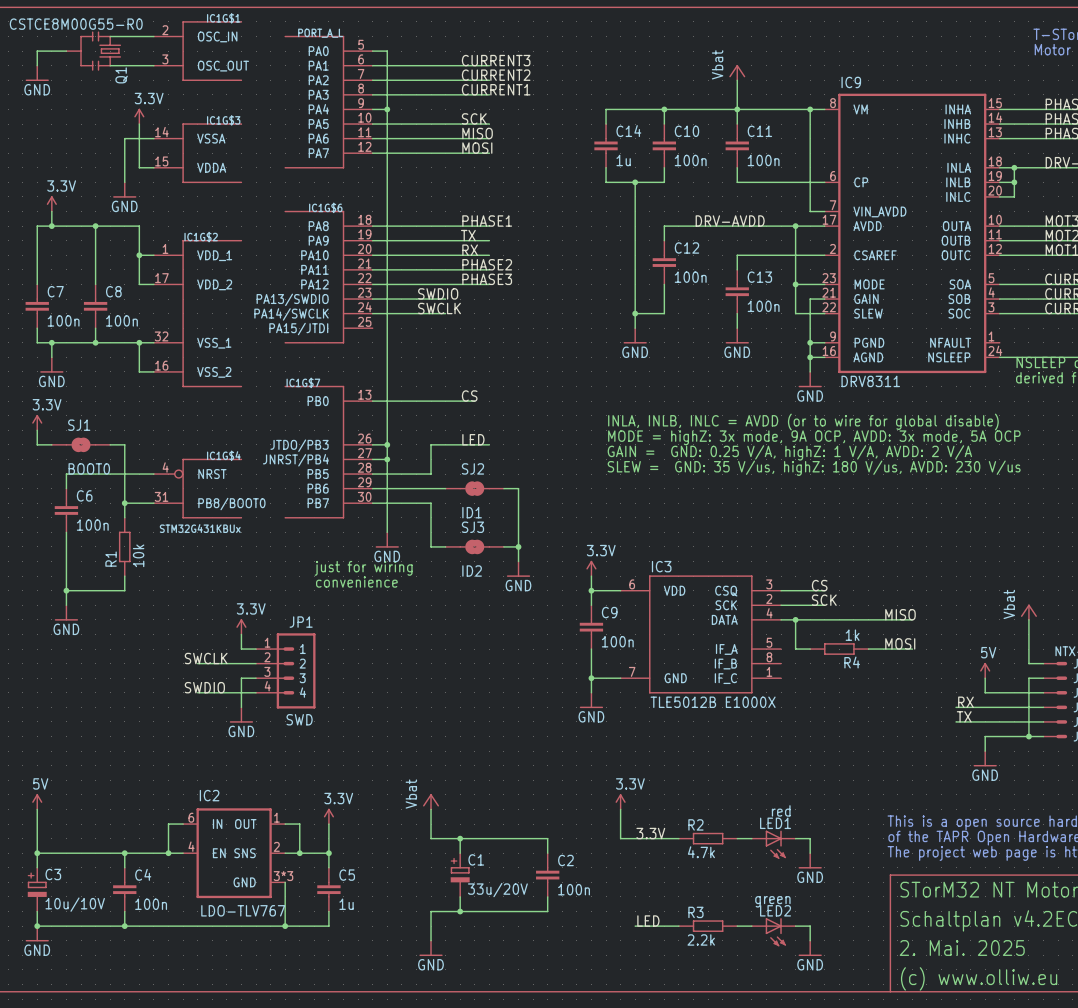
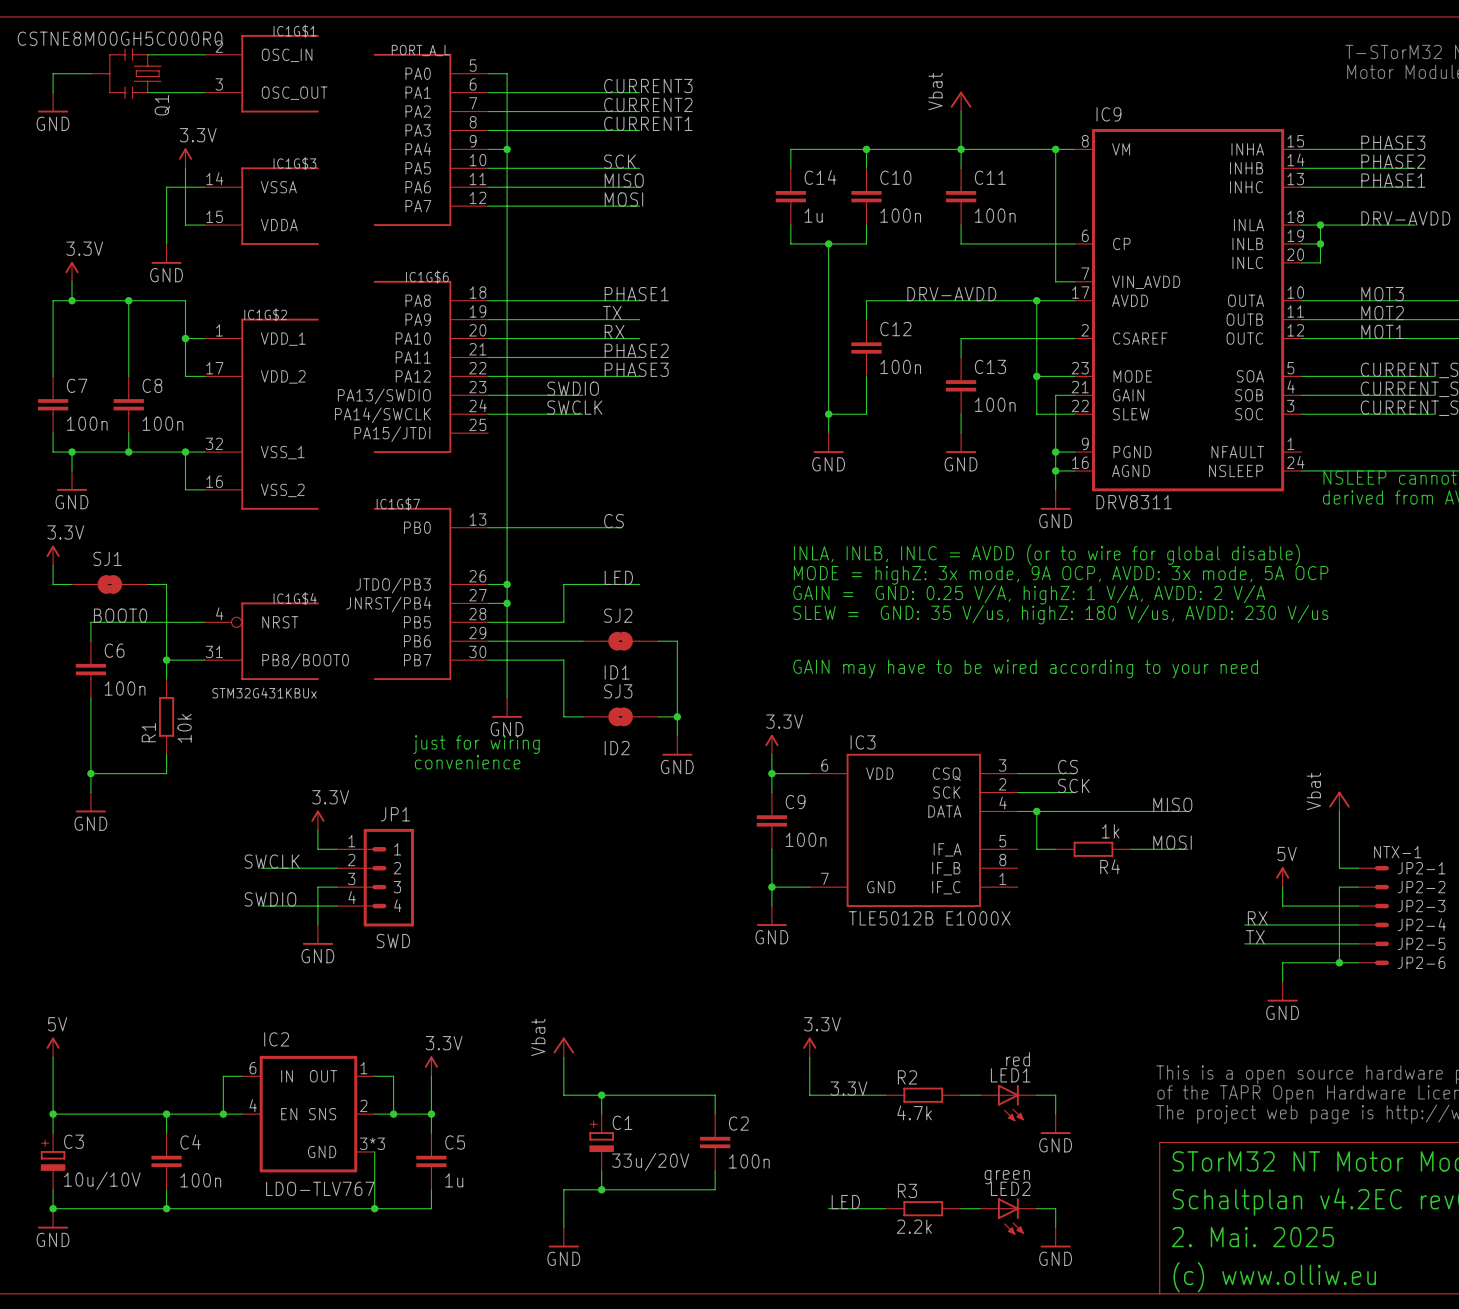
Q1 value: CSTCE8M00G55-R0 (76, 24) -> CSTNE8M00GH5C000R0 (120, 38)
text: none -> GAIN may have to be wired according to your need (1025, 668)

